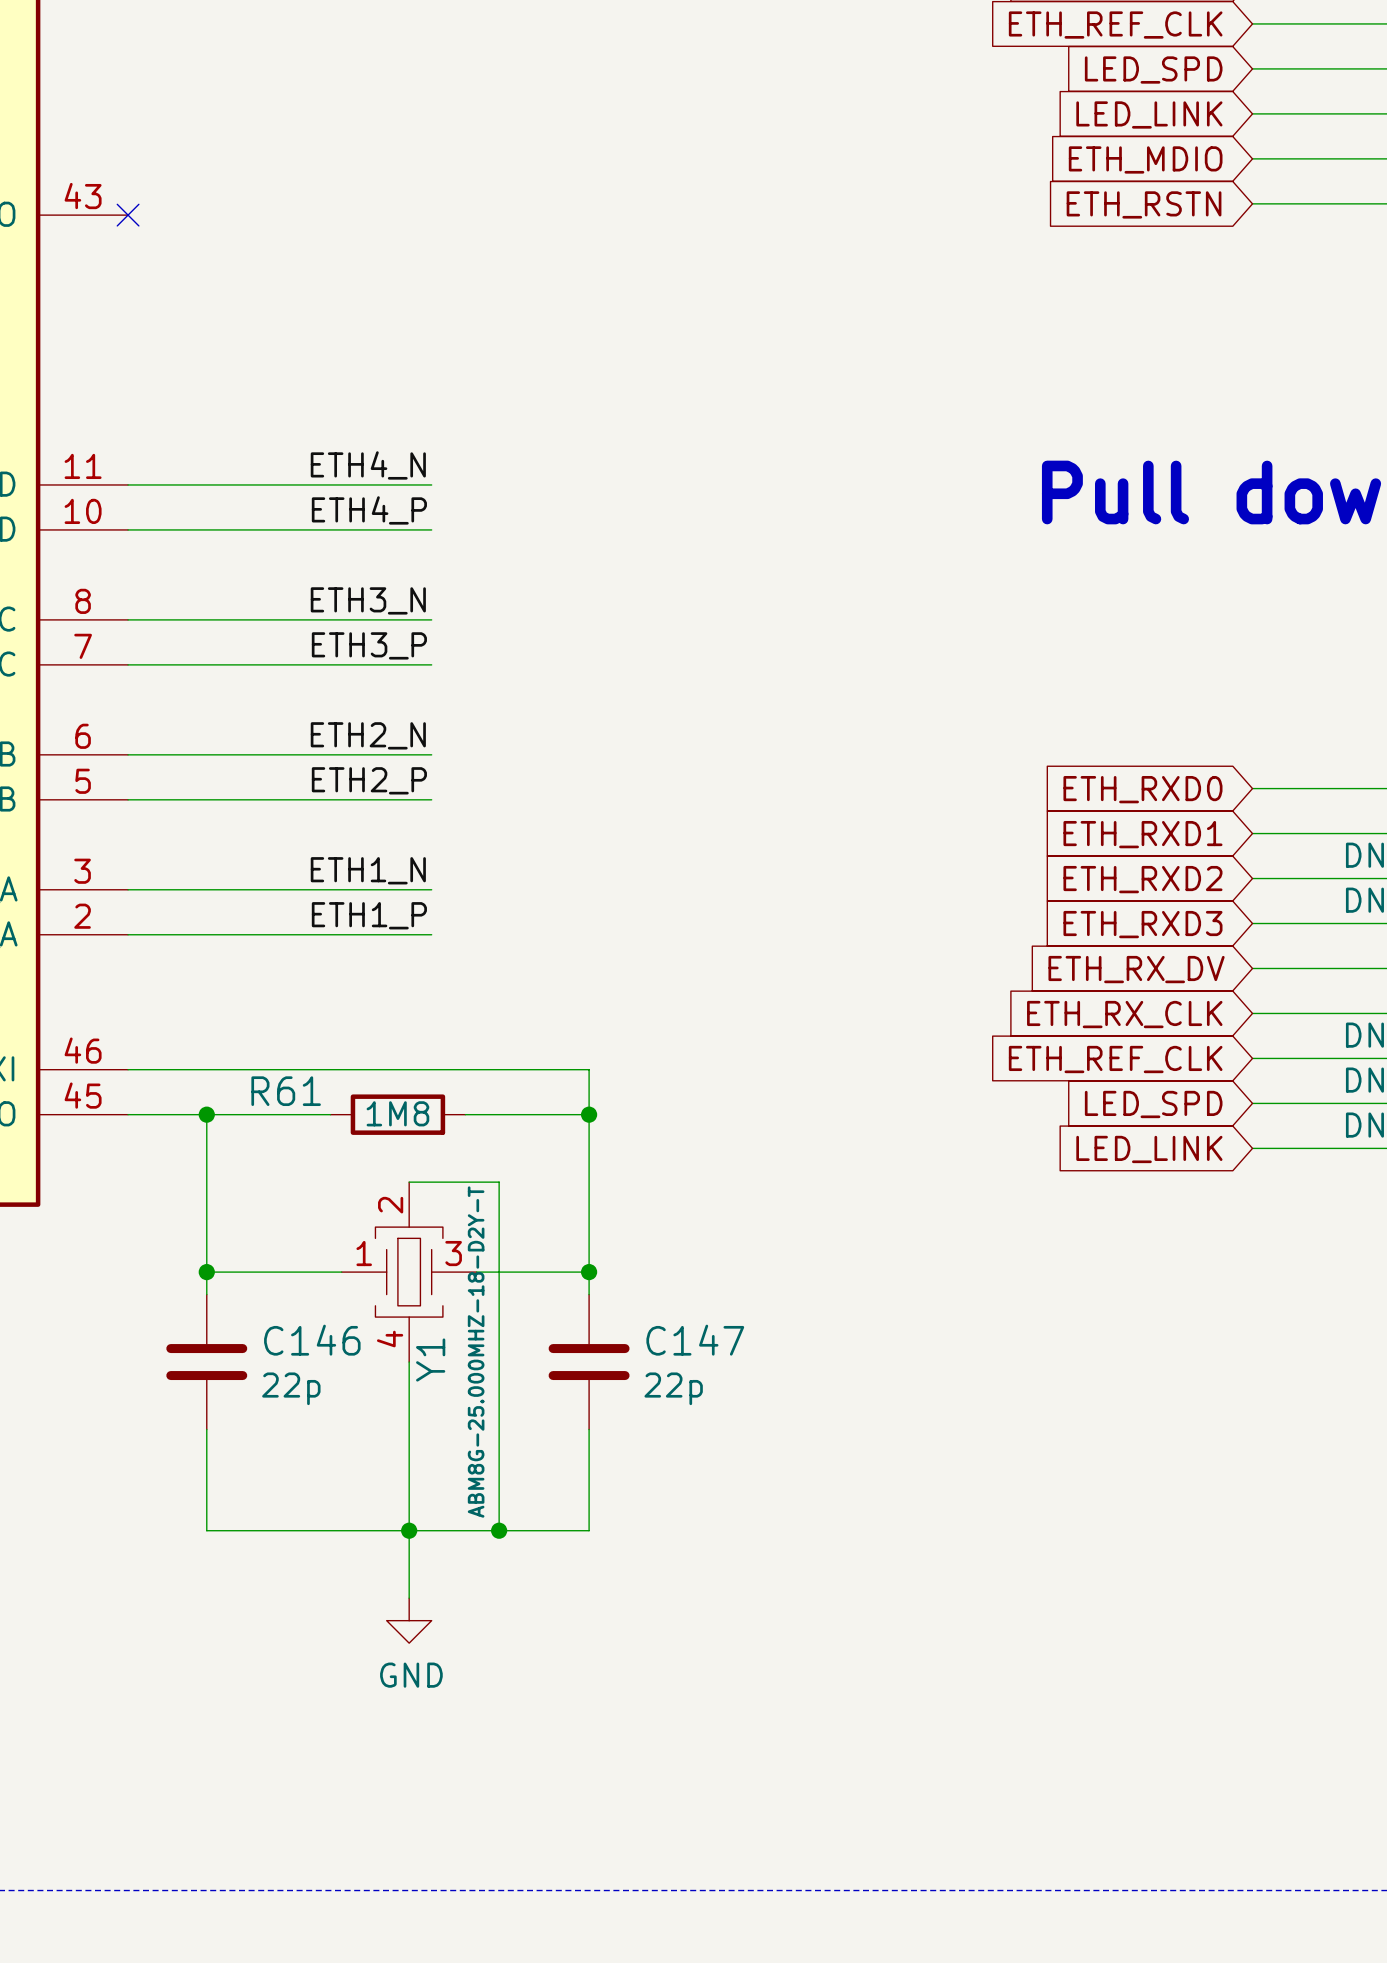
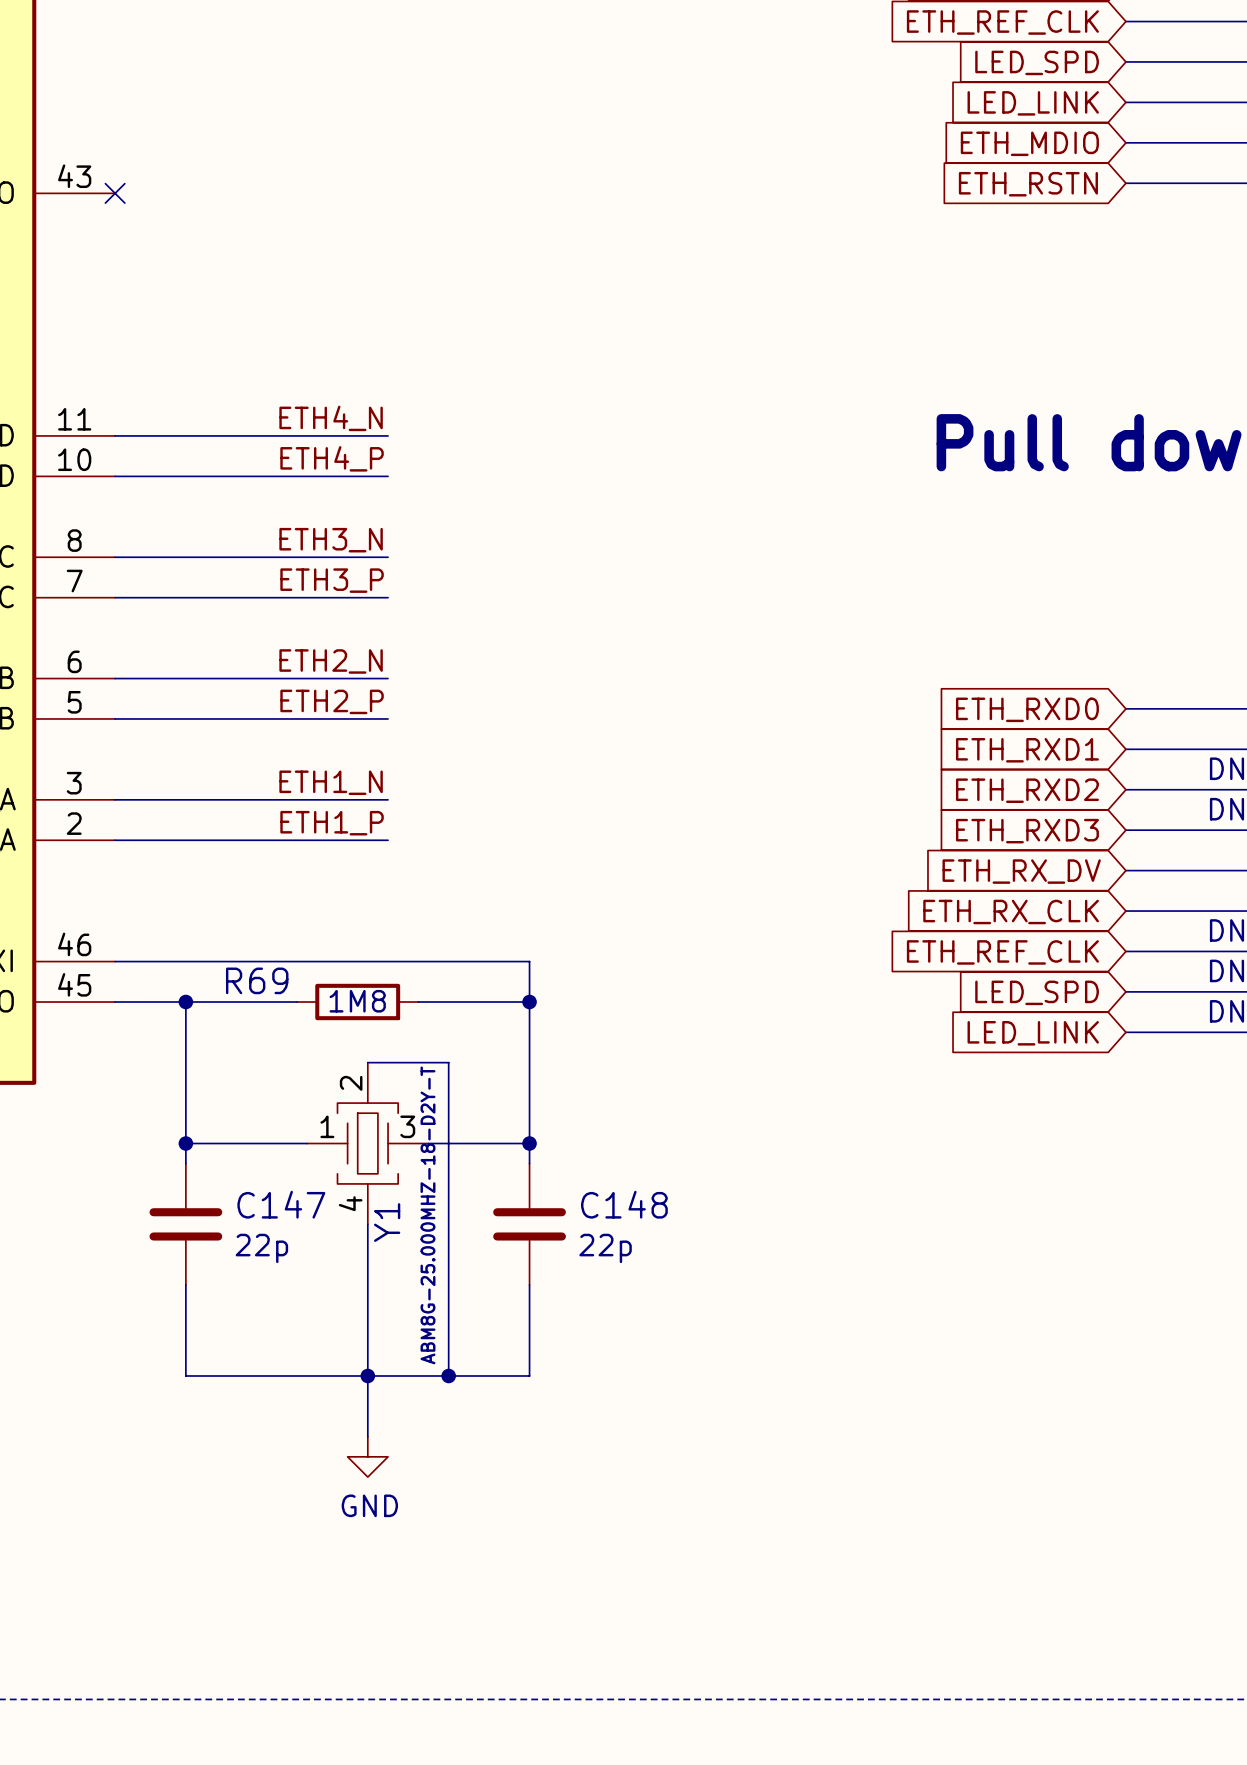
R61 name: R61 (286, 1091) -> R69 (257, 980)
C146 name: C146 (312, 1340) -> C147 (281, 1204)
C147 name: C147 (695, 1340) -> C148 (624, 1204)

